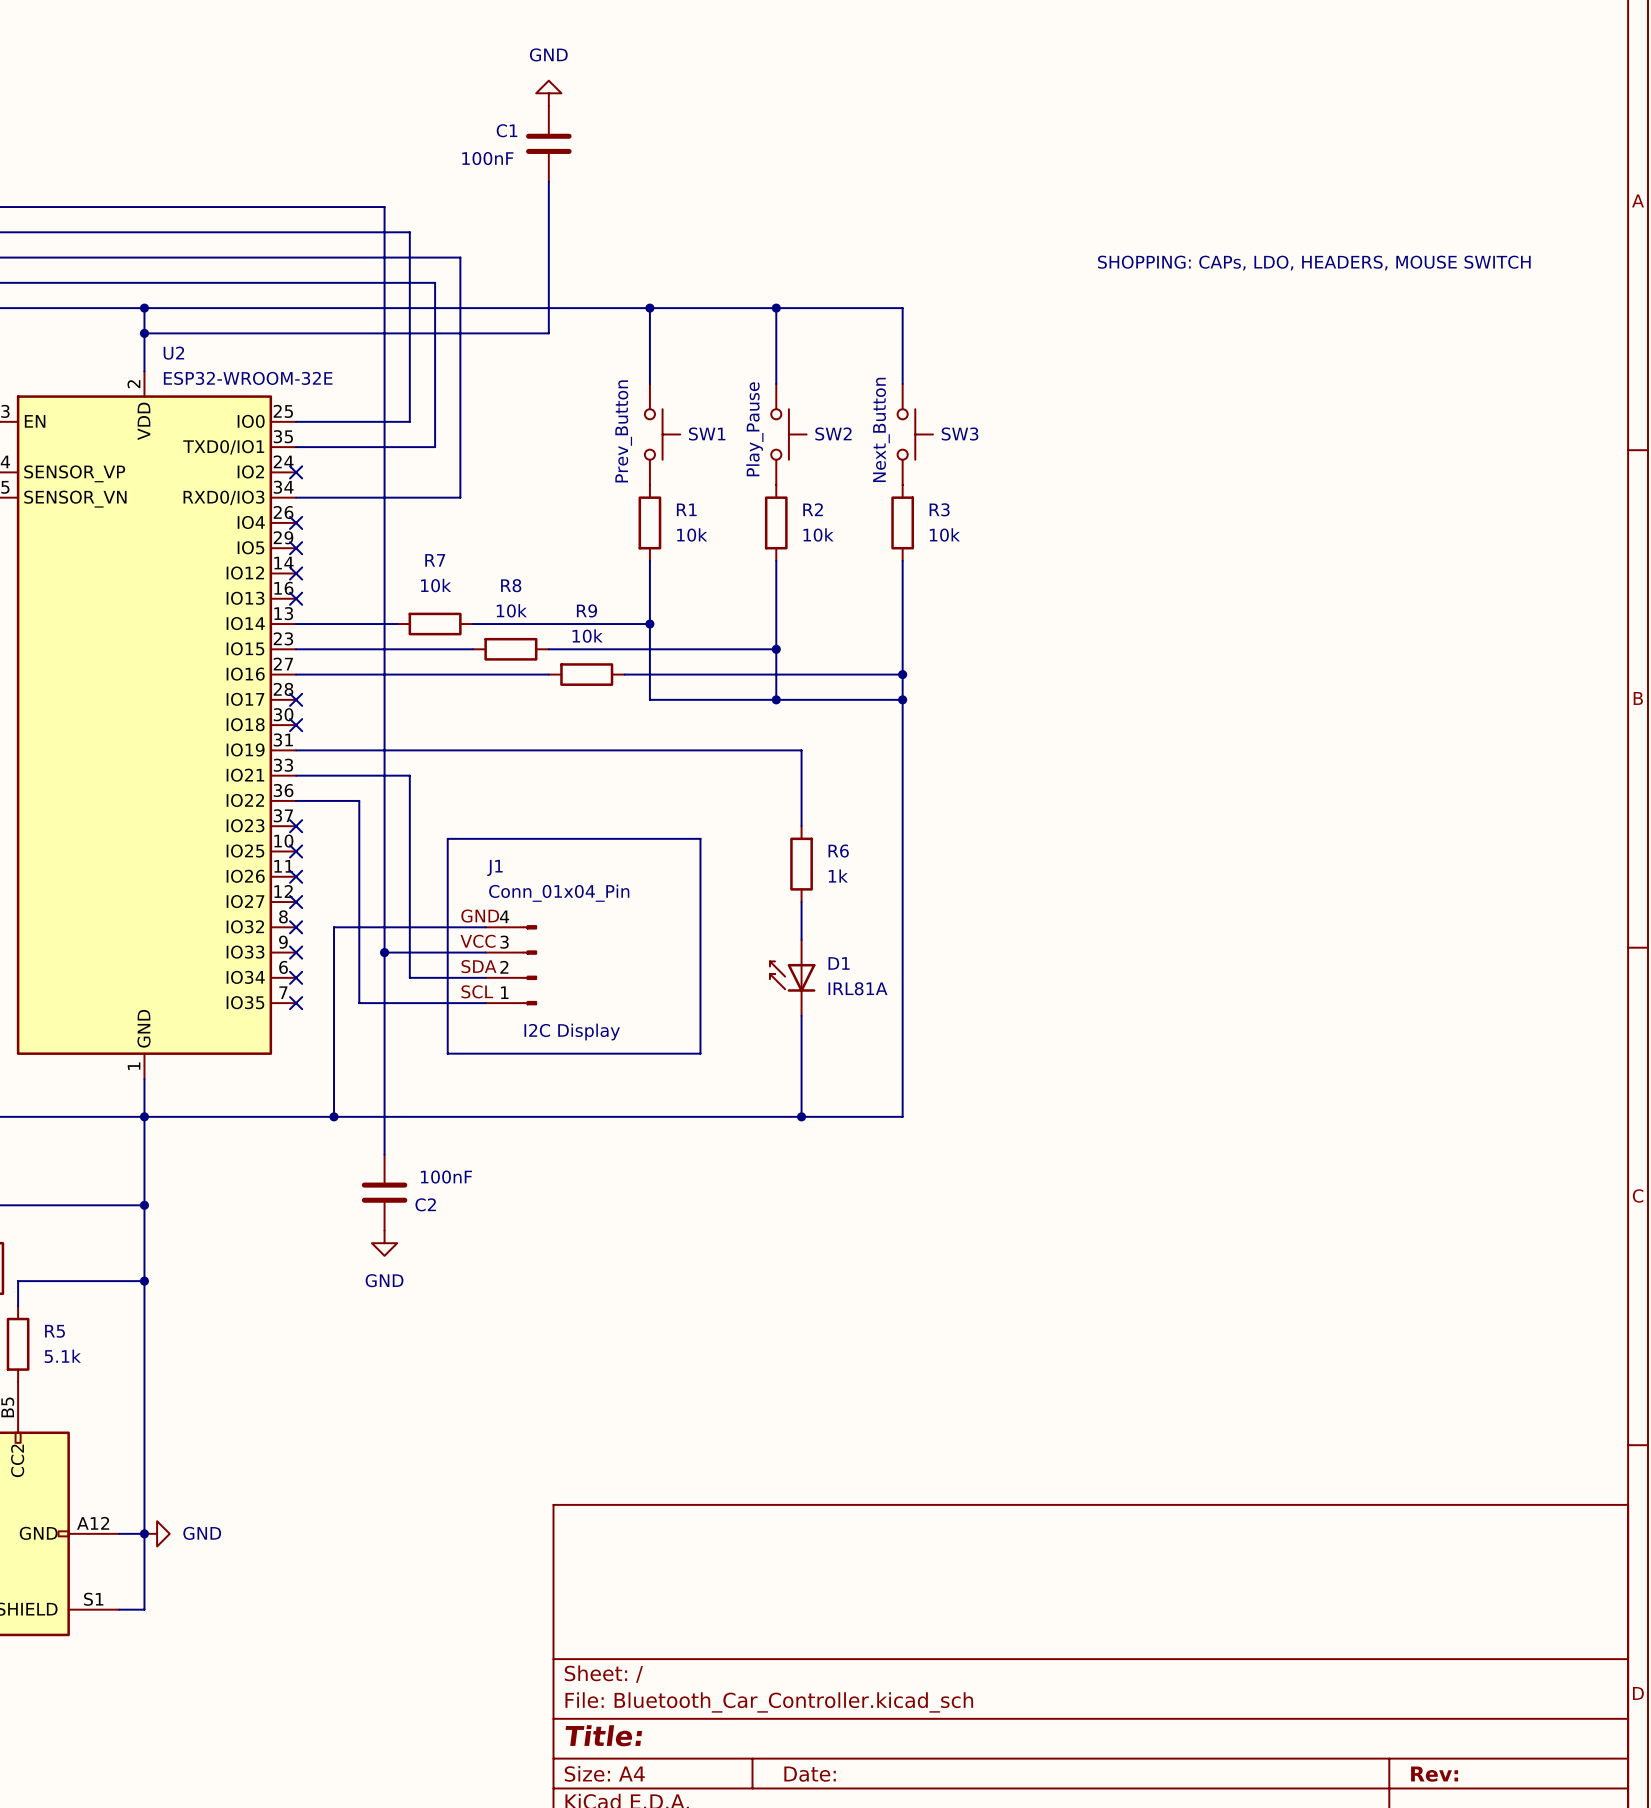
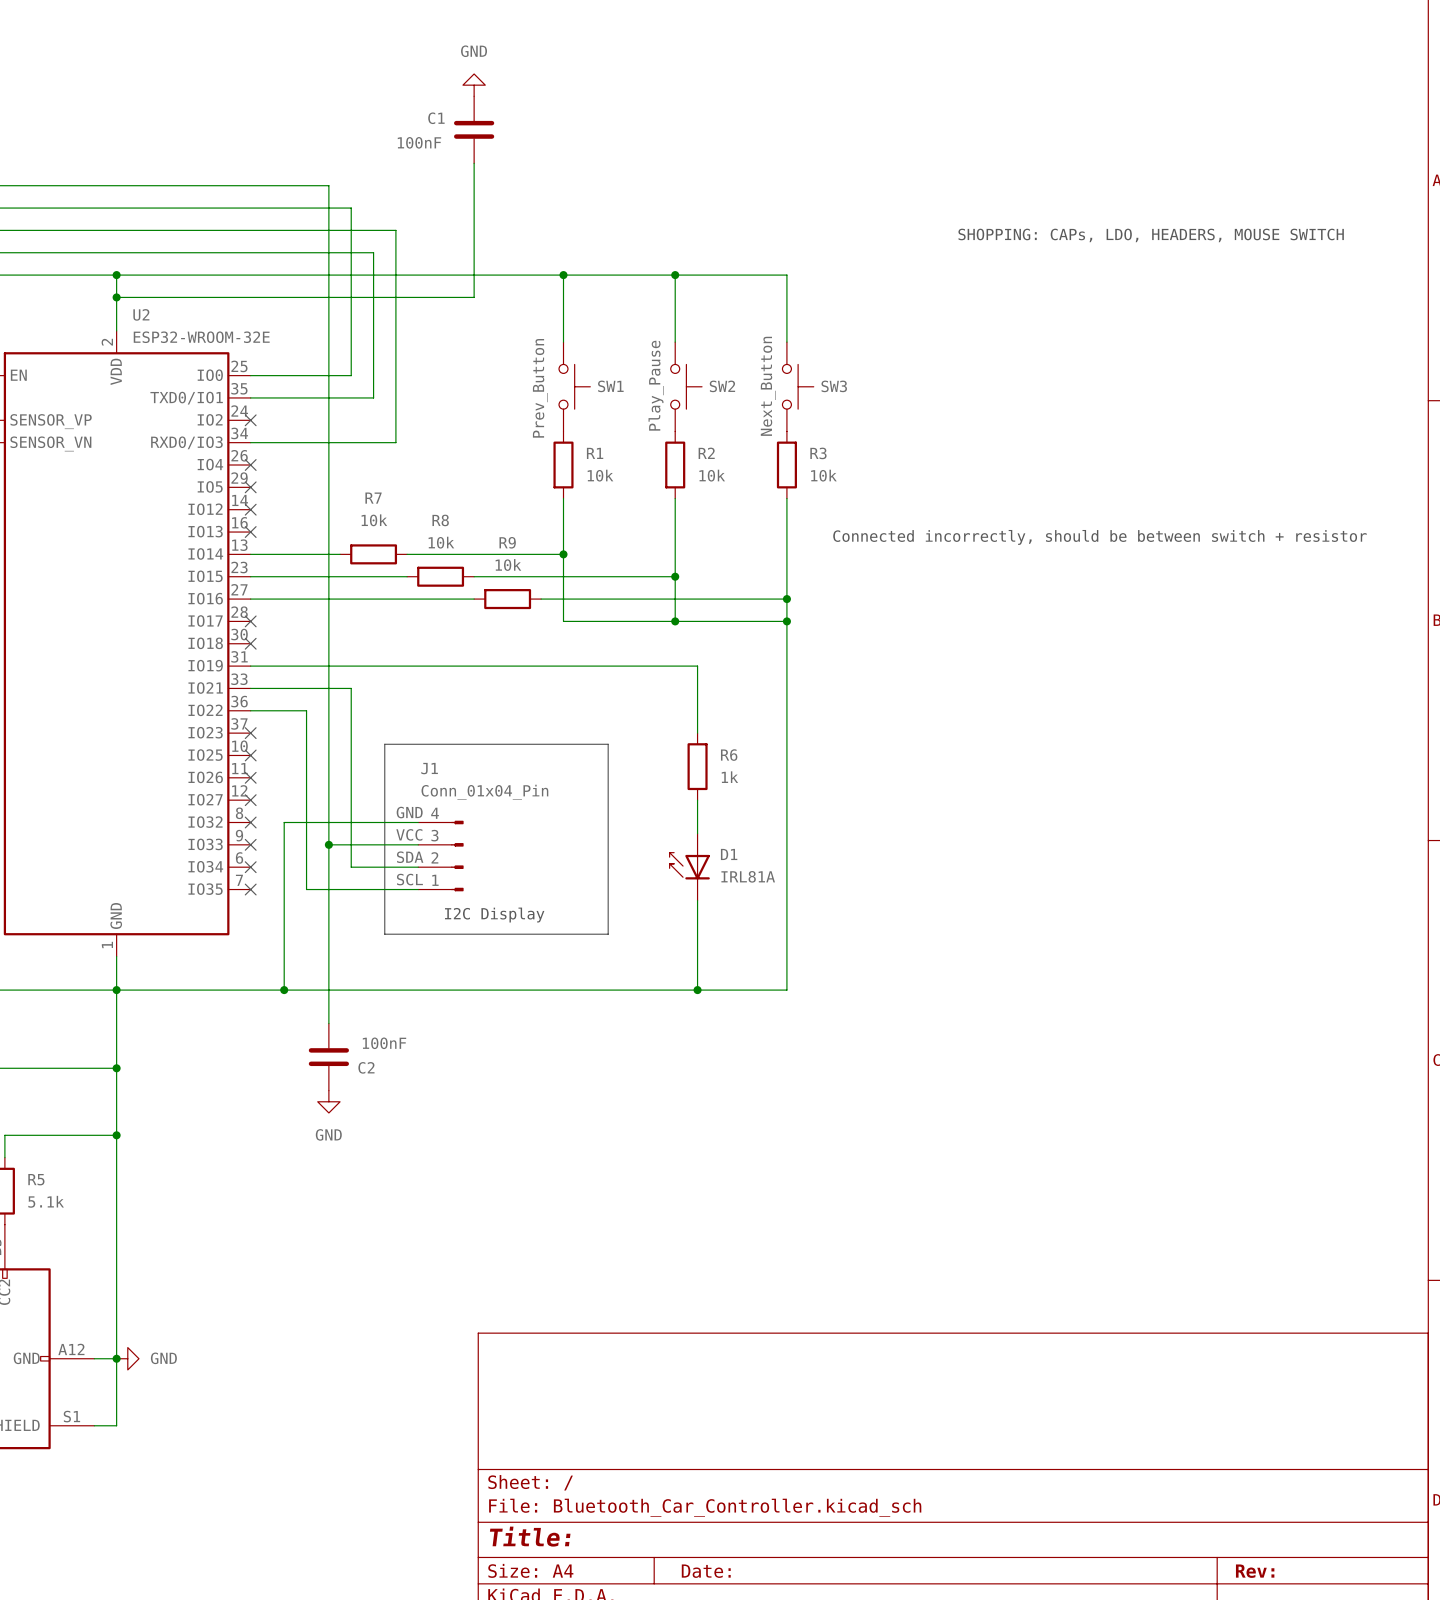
text: none -> Connected incorrectly, should be between switch + resistor (1099, 537)

